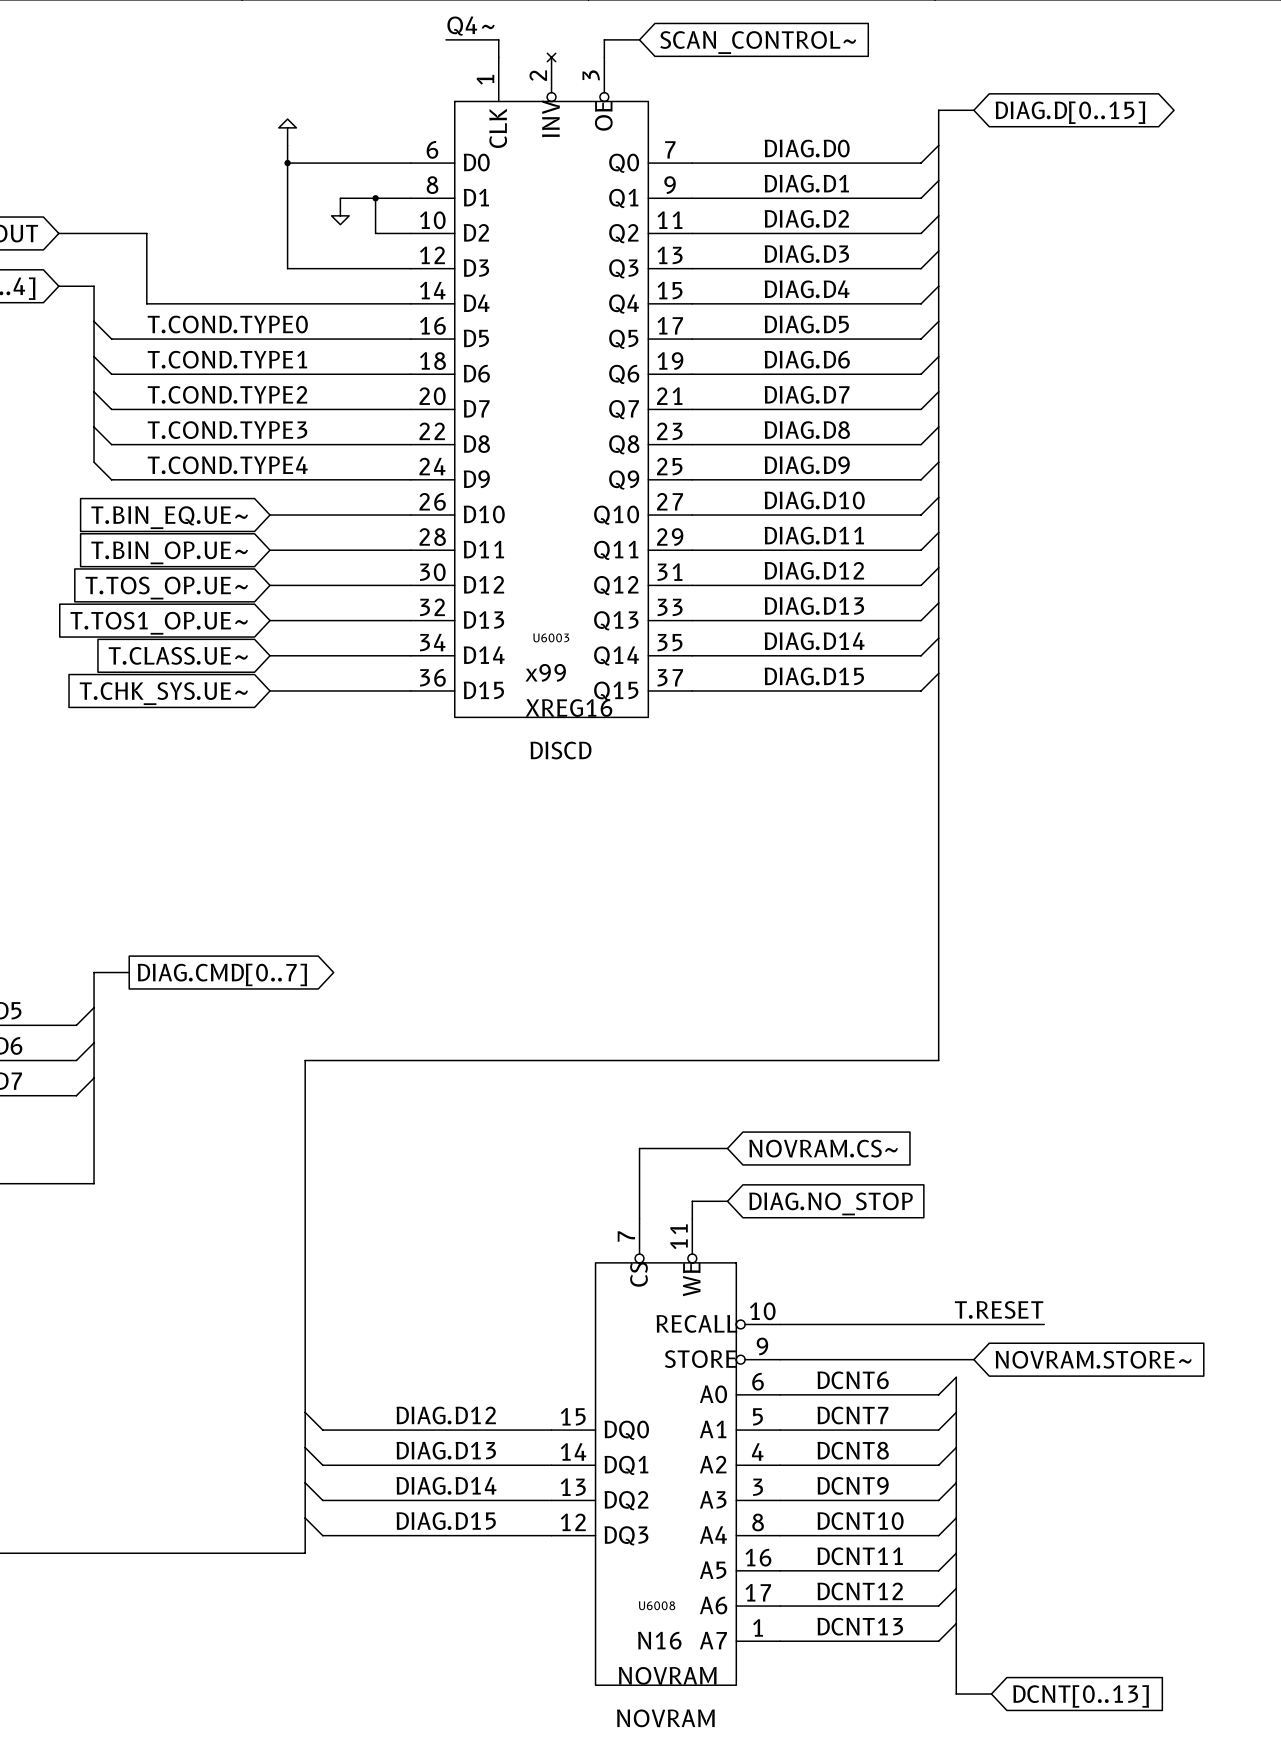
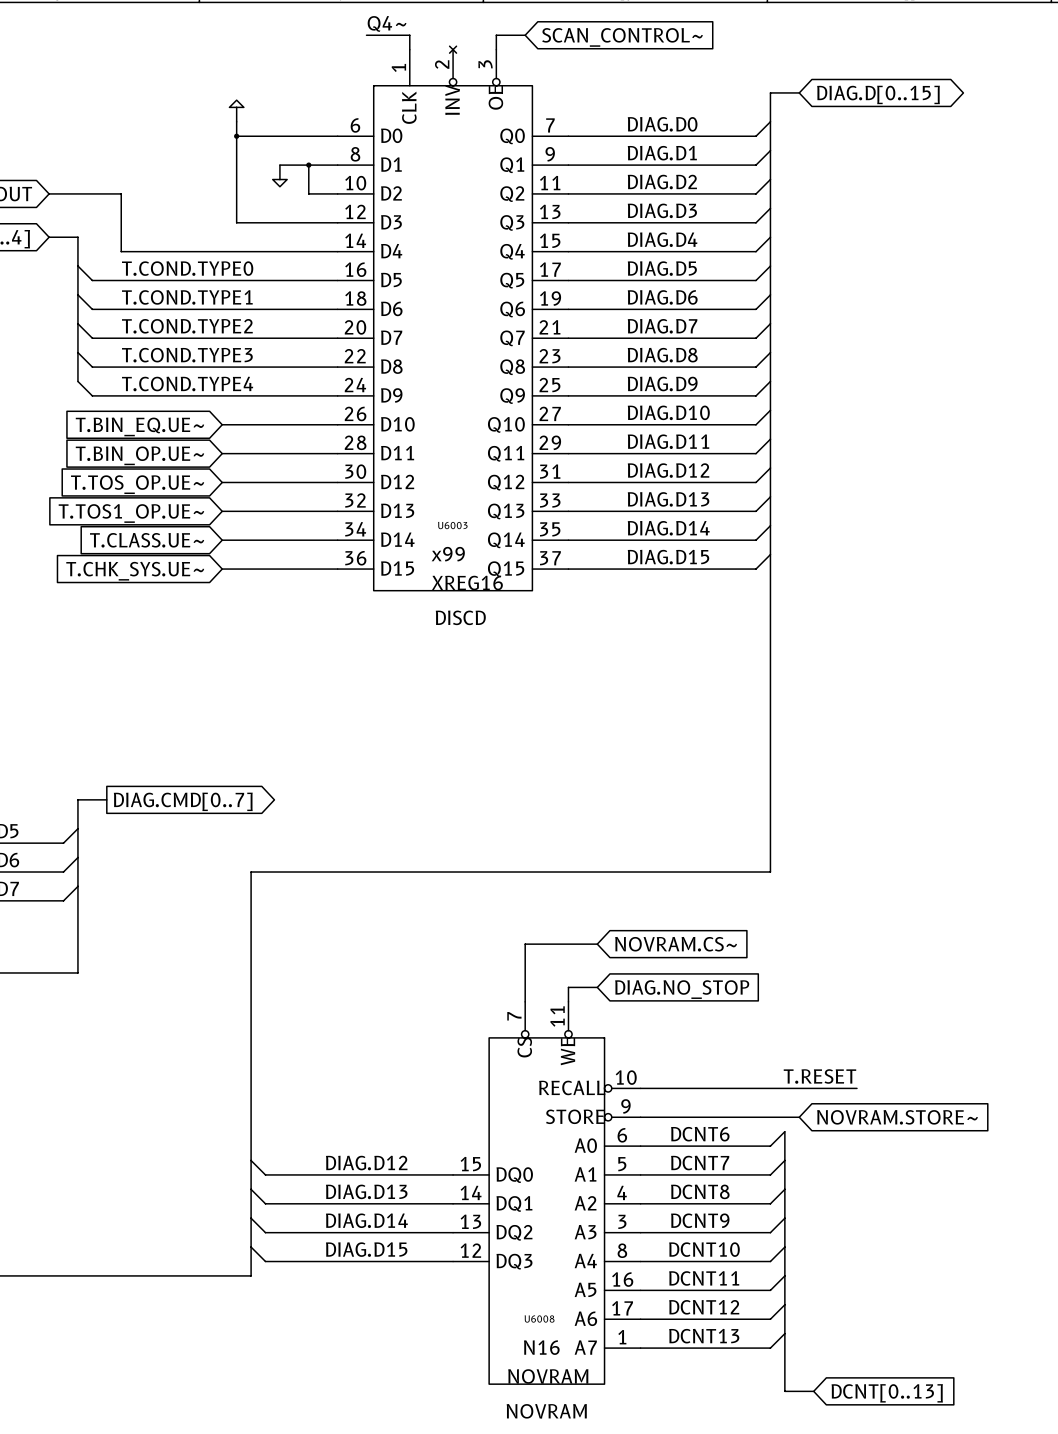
label position: DCNT10 (860, 1521) -> DCNT10 (704, 1249)
label position: DCNT11 (860, 1556) -> DCNT11 (704, 1278)
label position: DCNT12 (860, 1591) -> DCNT12 (704, 1307)
label position: DCNT13 (860, 1626) -> DCNT13 (704, 1336)

